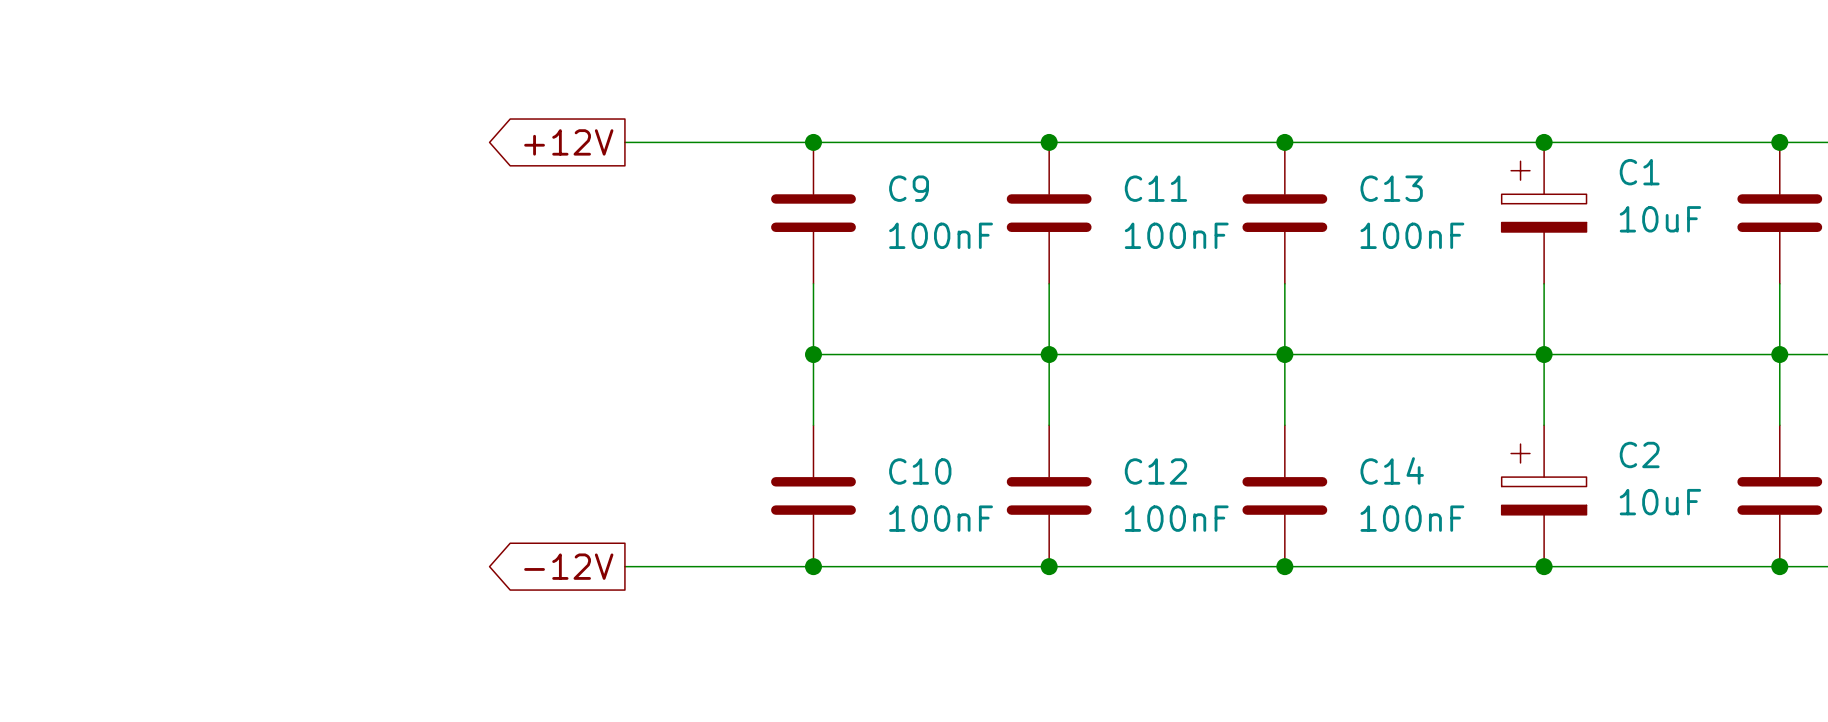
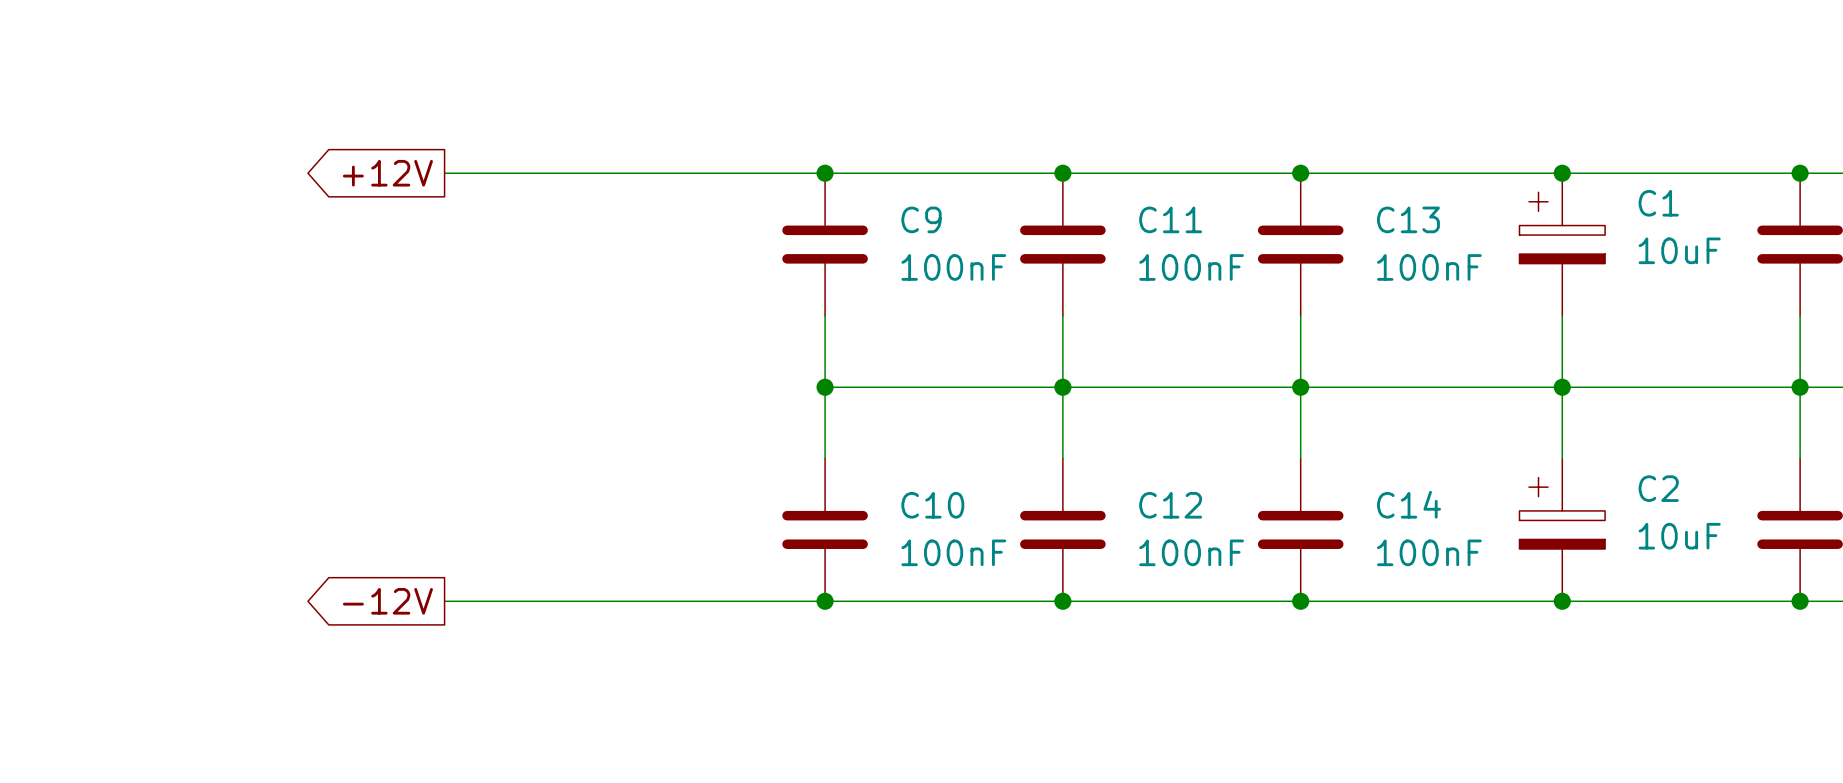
wire: none -> (444, 173) (634, 173)
global label position: +12V (568, 142) -> +12V (387, 173)
wire: none -> (444, 601) (634, 601)
global label position: -12V (568, 566) -> -12V (387, 601)

